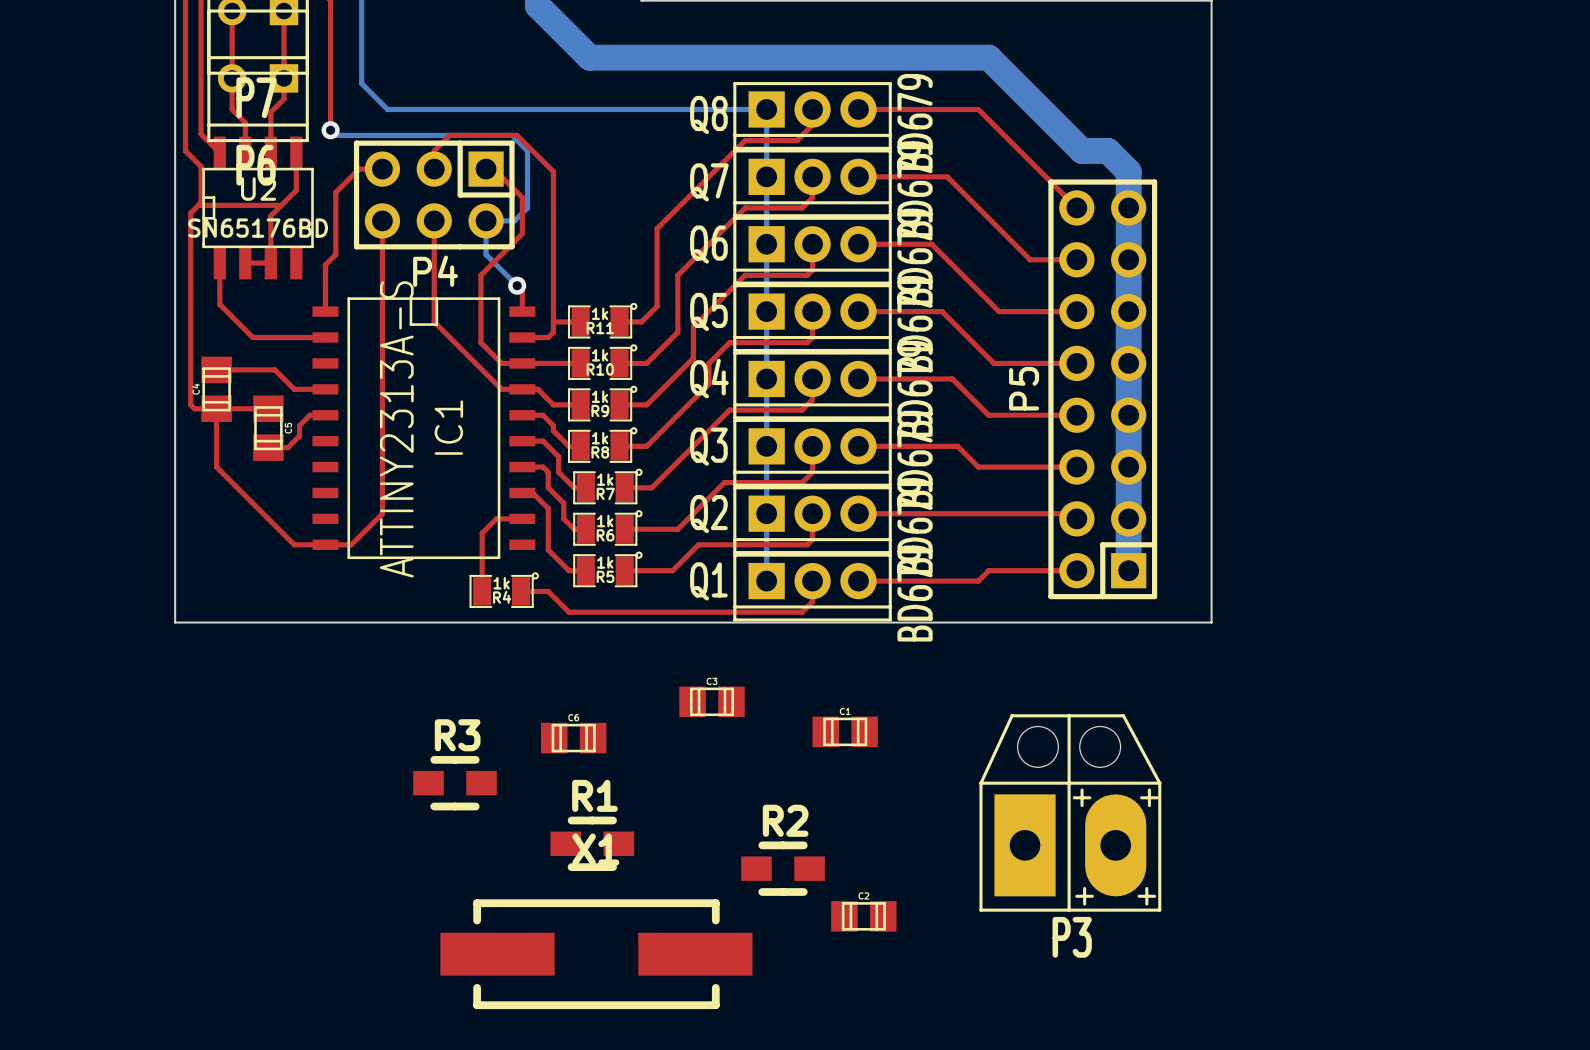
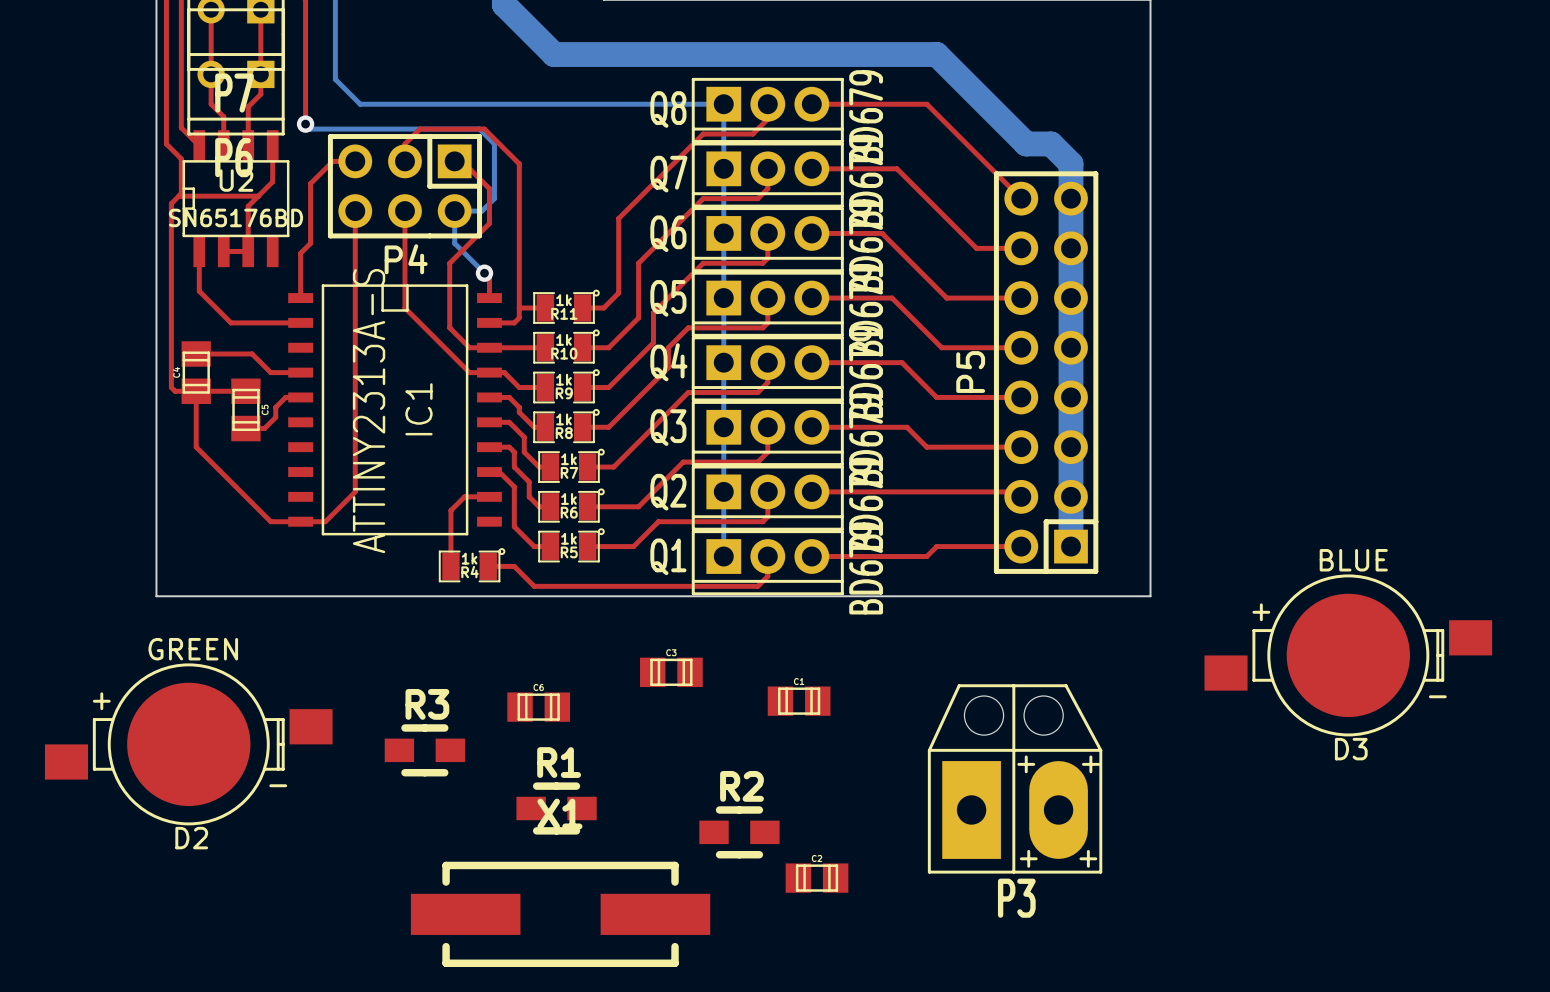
D3: none -> BLUE (1348, 655)
D2: none -> GREEN (188, 744)

